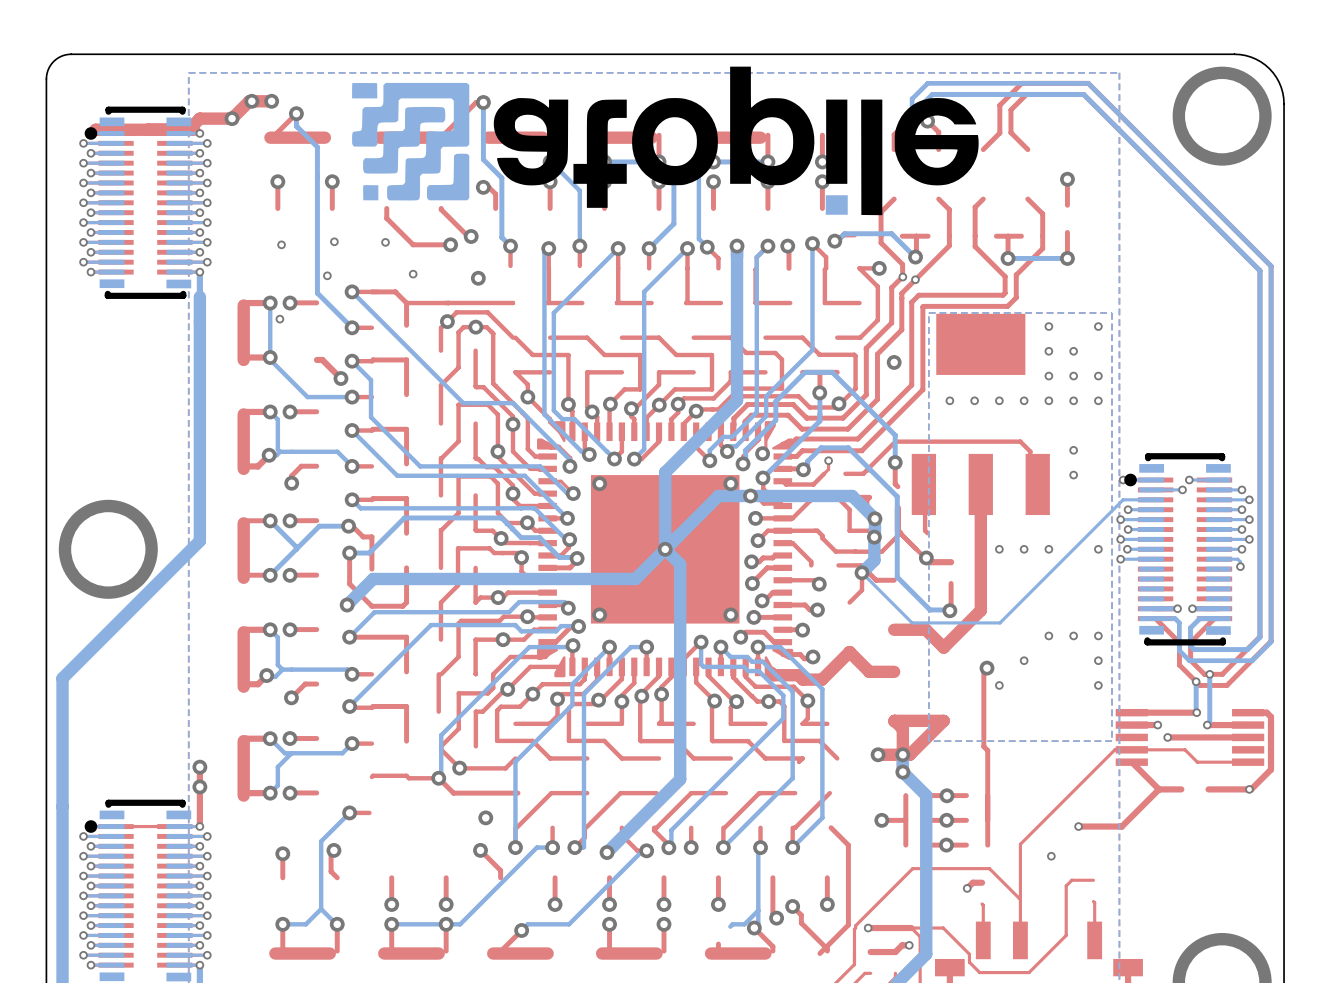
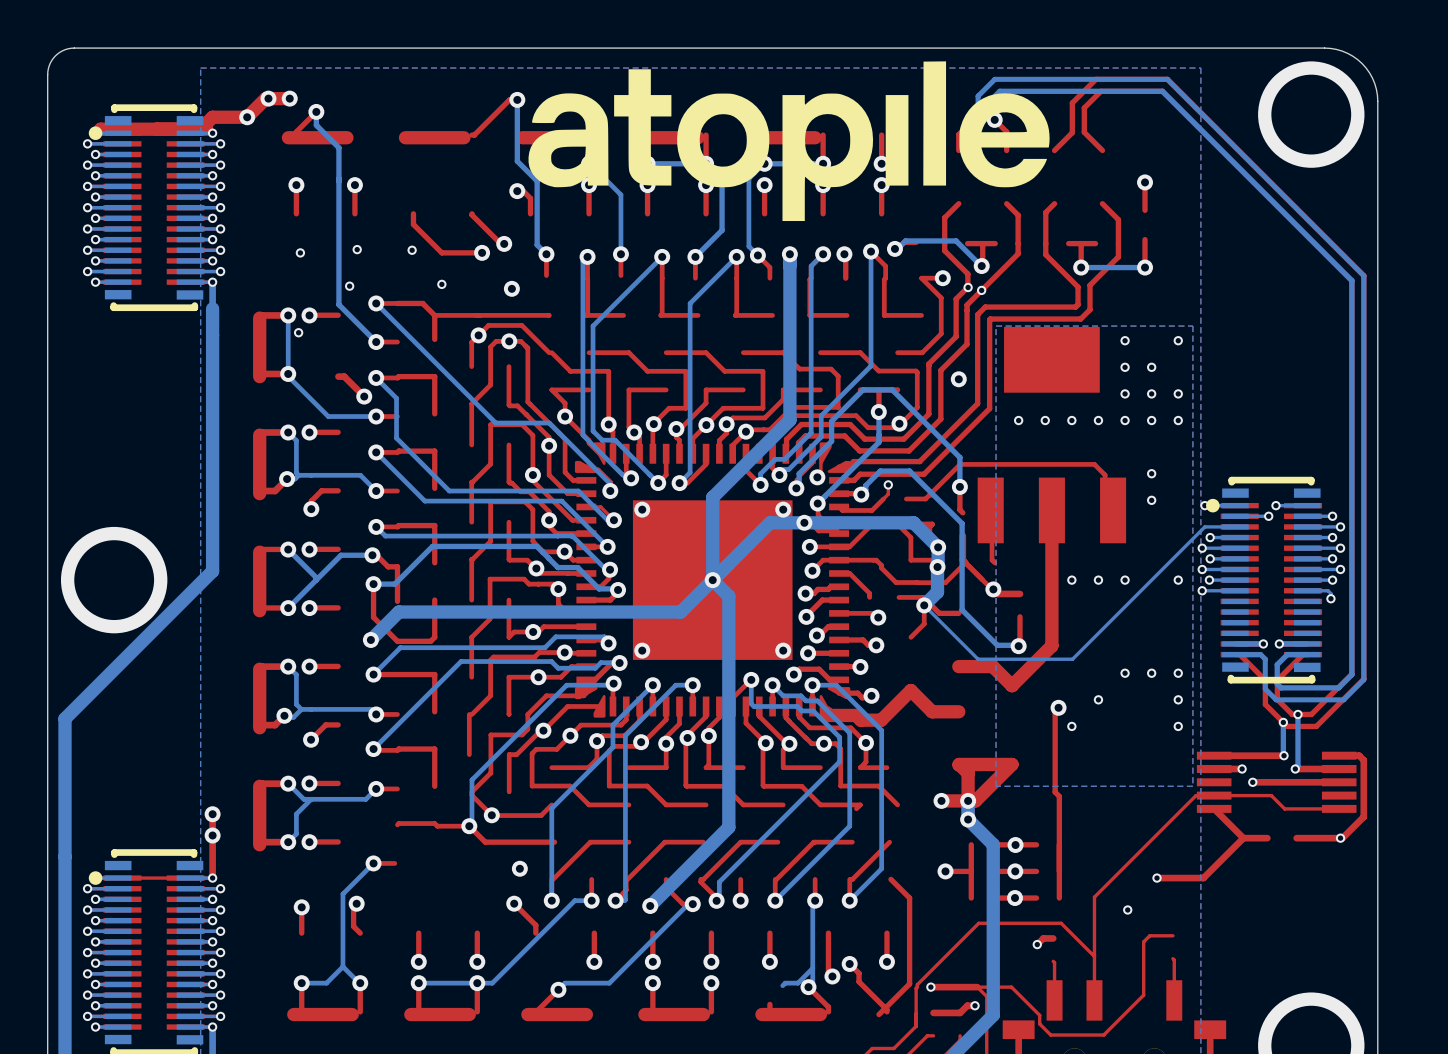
drawing: [352, 66, 979, 216] -> none
drawing: none -> [528, 61, 1050, 222]

